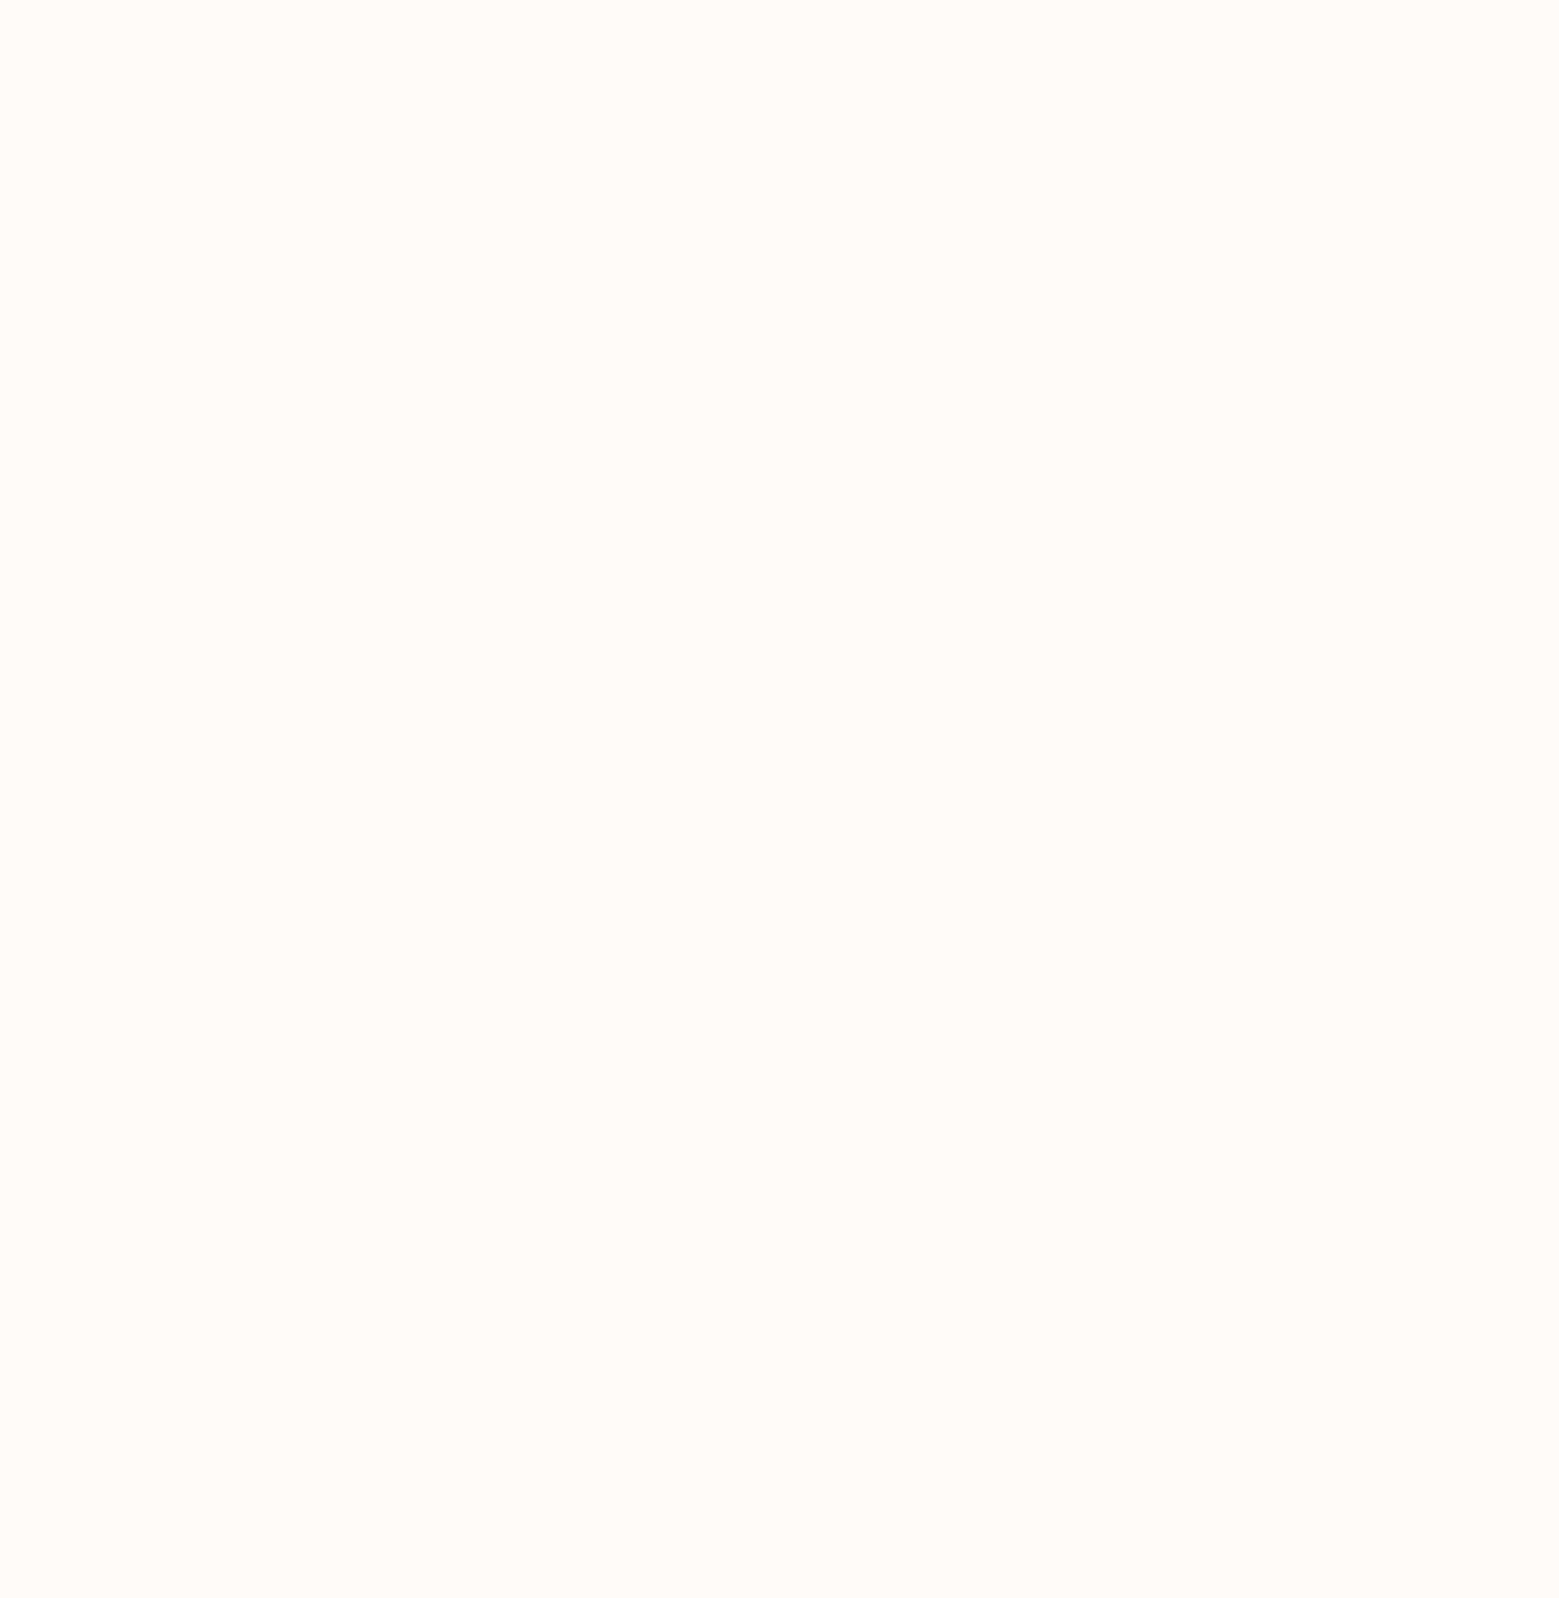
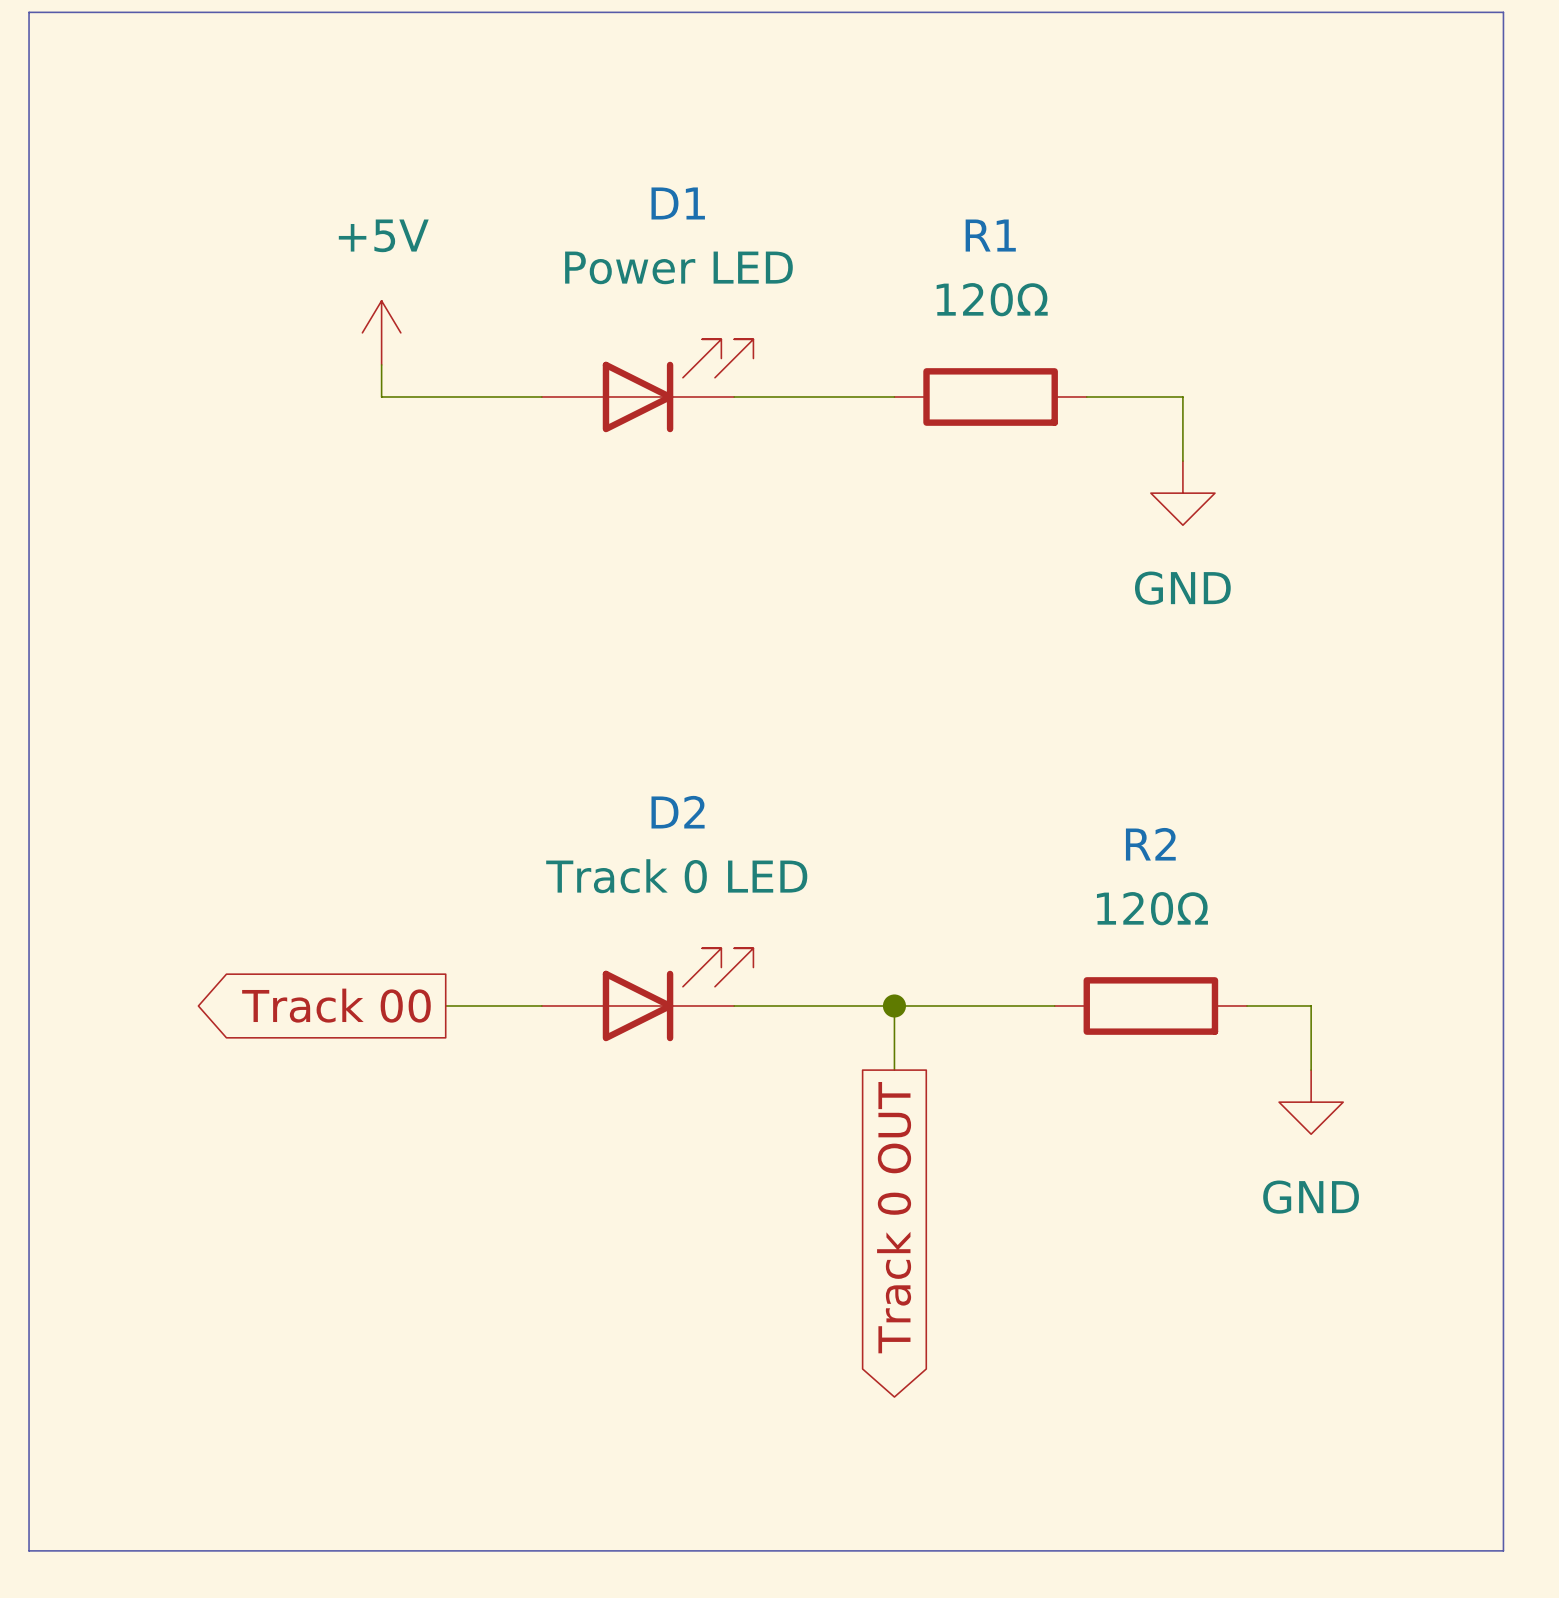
line: none -> (29, 12) (1503, 12) (1503, 1550) (29, 1550) (29, 12)
power symbol: none -> +5V (381, 332)
wire: none -> (381, 364) (381, 396) (541, 396)
D1: none -> Power LED (647, 385)
wire: none -> (734, 396) (894, 396)
R1: none -> 120Ω (990, 396)
wire: none -> (1086, 396) (1182, 396) (1182, 461)
power symbol: none -> GND (1182, 493)
D2: none -> Track 0 LED (647, 994)
global label: none -> Track 00 (336, 1005)
wire: none -> (445, 1005) (541, 1005)
wire: none -> (734, 1005) (1054, 1005)
wire: none -> (894, 1005) (894, 1070)
junction: none -> (894, 1005)
R2: none -> 120Ω (1150, 1005)
wire: none -> (1247, 1005) (1311, 1005) (1311, 1070)
power symbol: none -> GND (1311, 1102)
global label: none -> Track 0 OUT (894, 1217)

